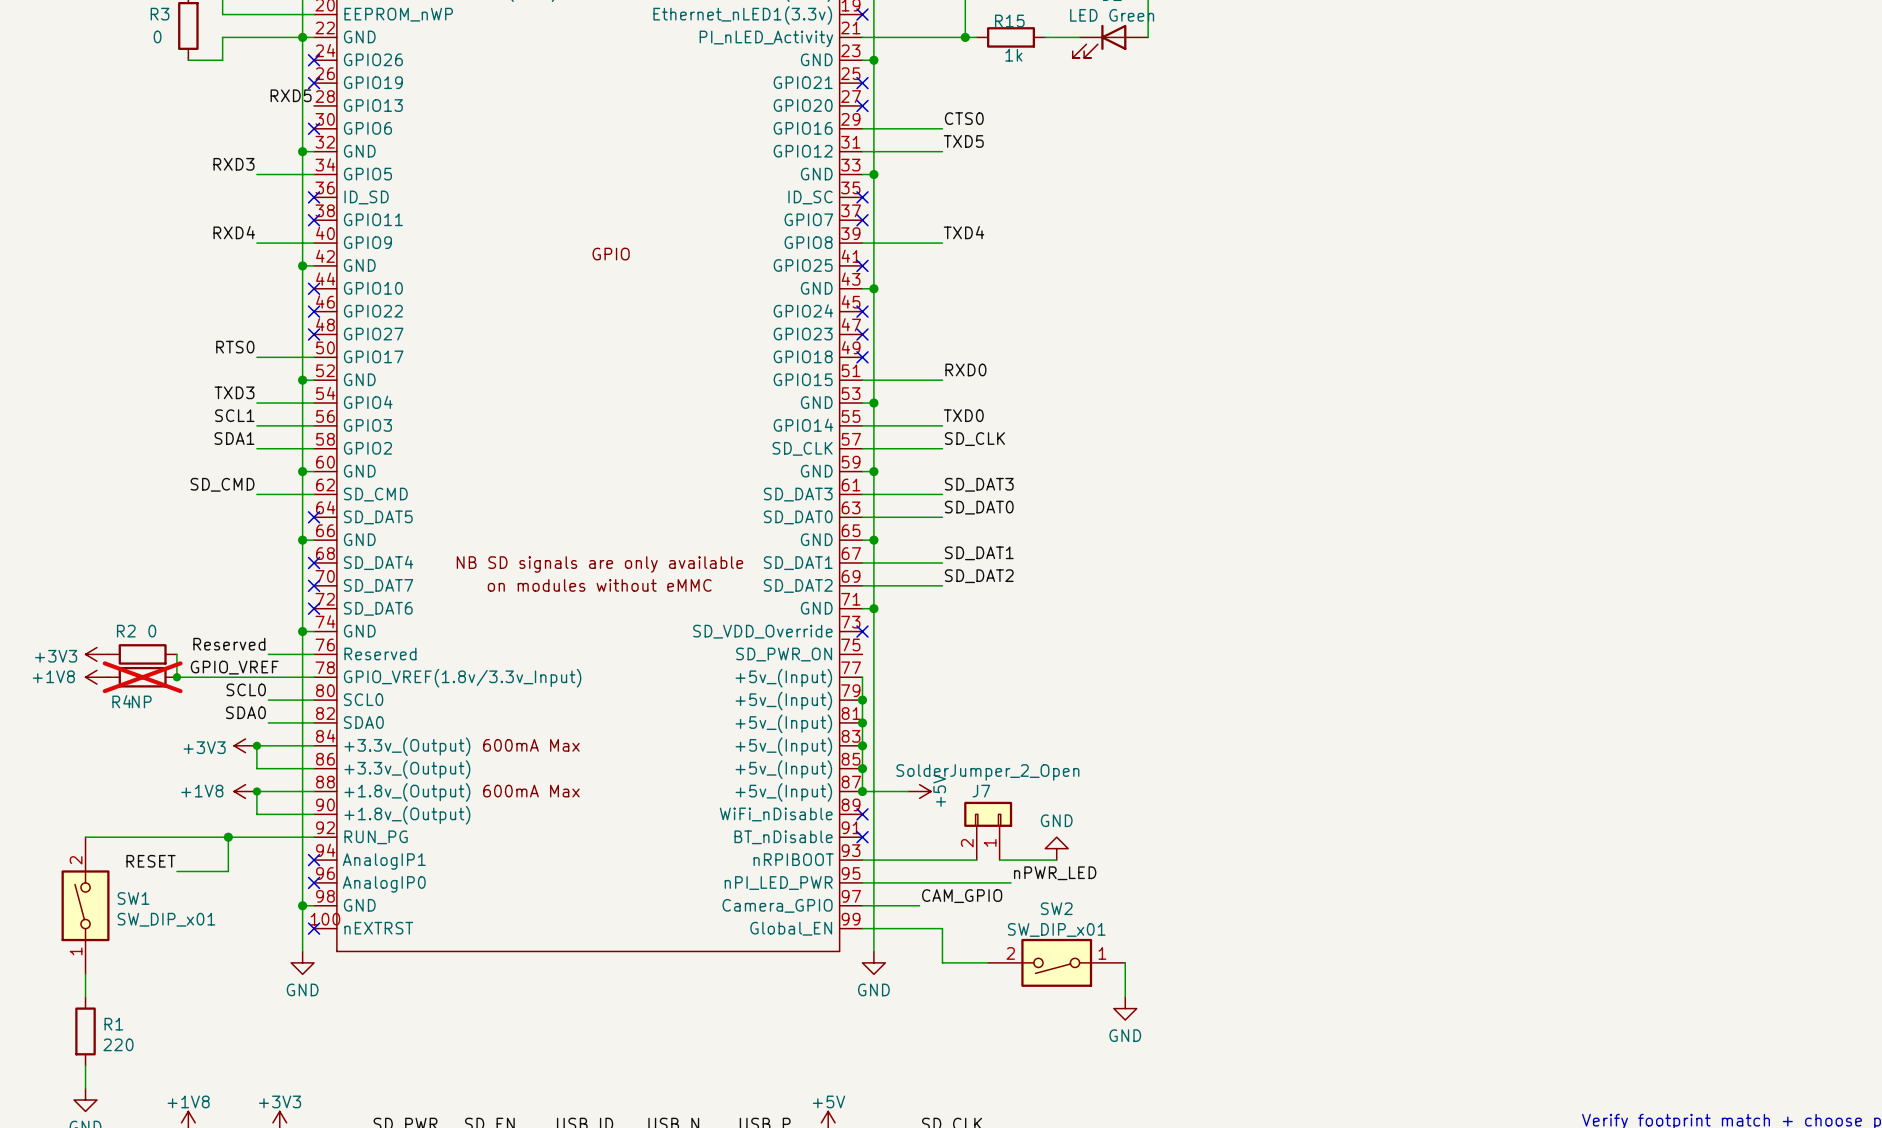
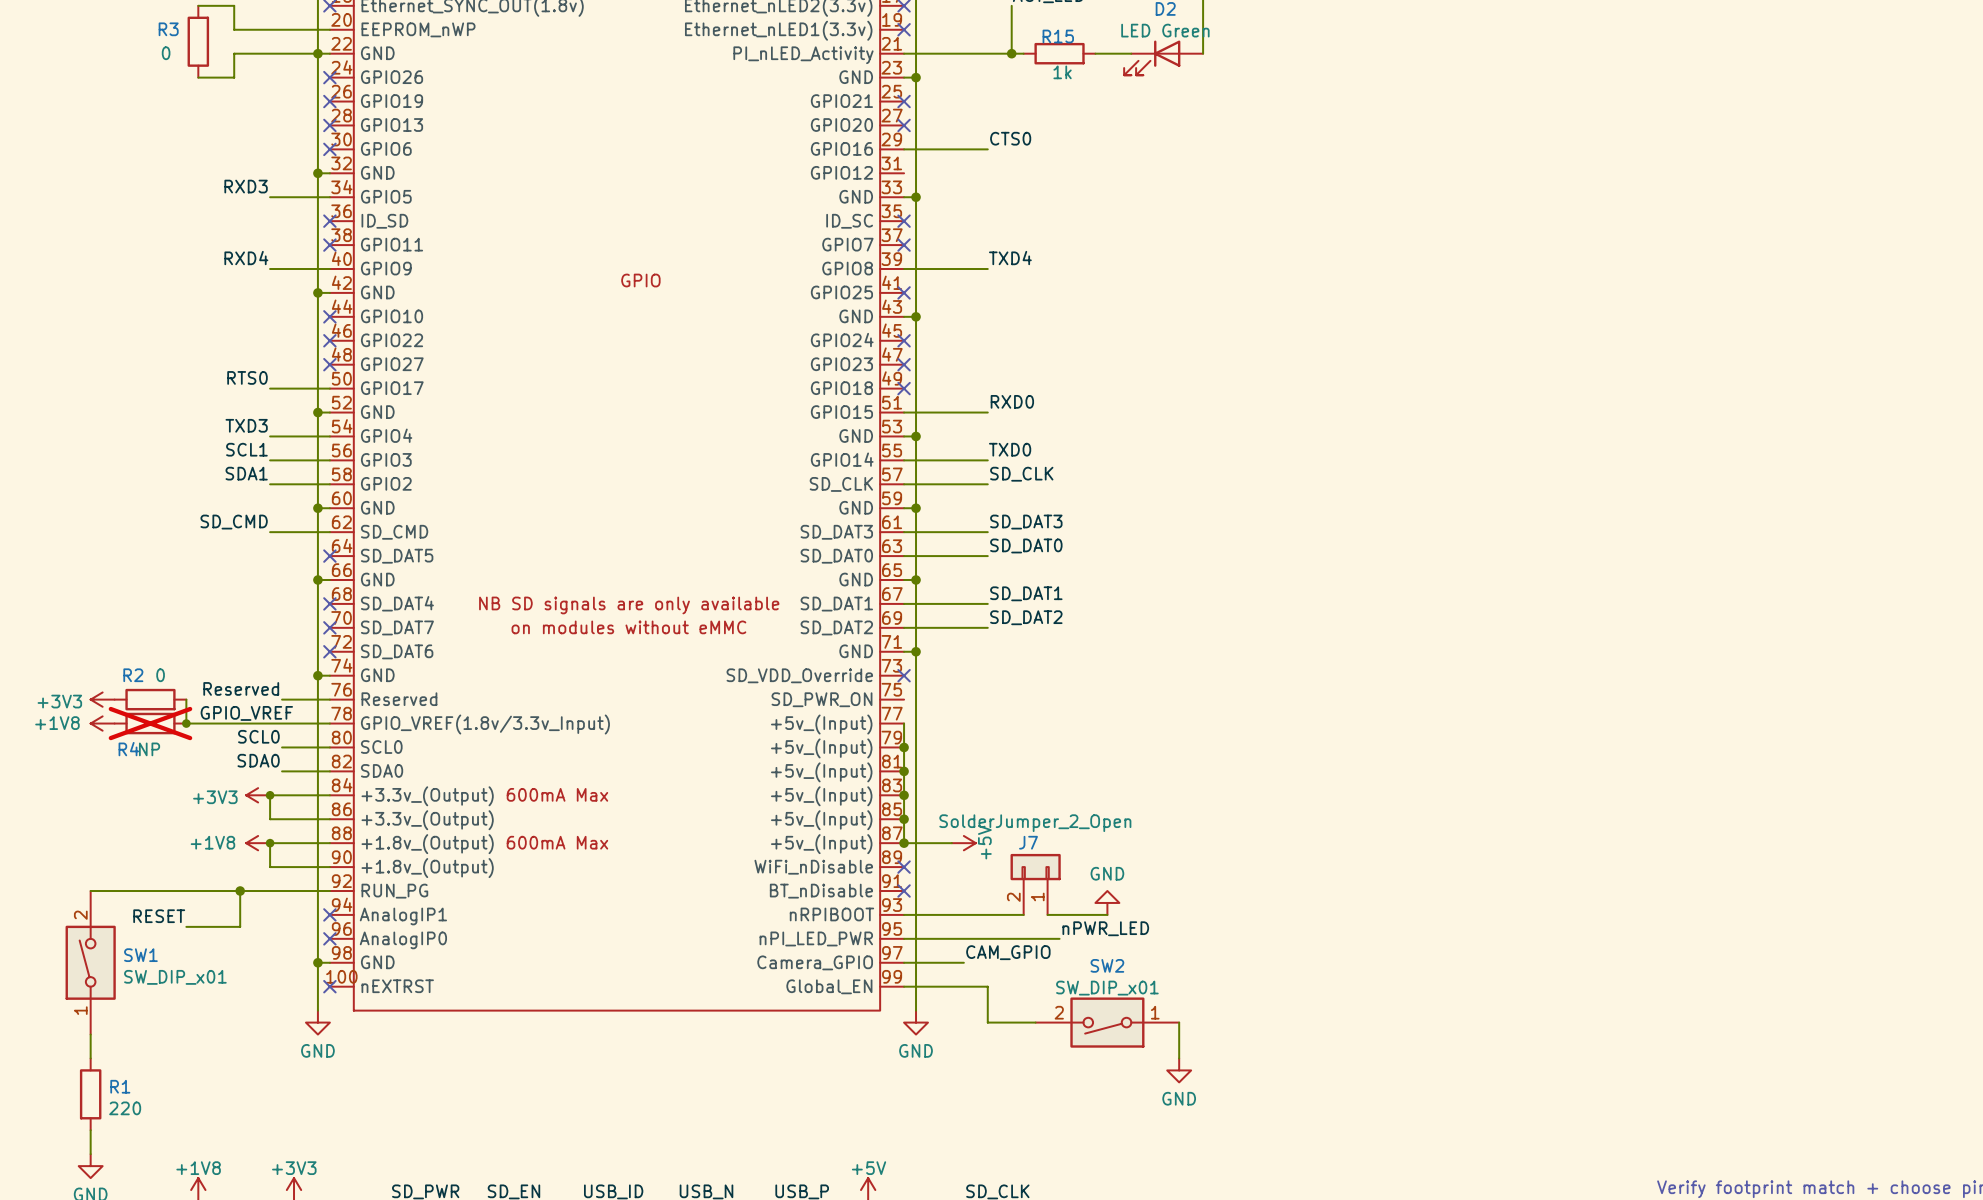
label: RXD5 (291, 95) -> none
no-connect mark: none -> (329, 125)
label: TXD5 (963, 141) -> none
wire: (862, 151) (942, 151) -> none

